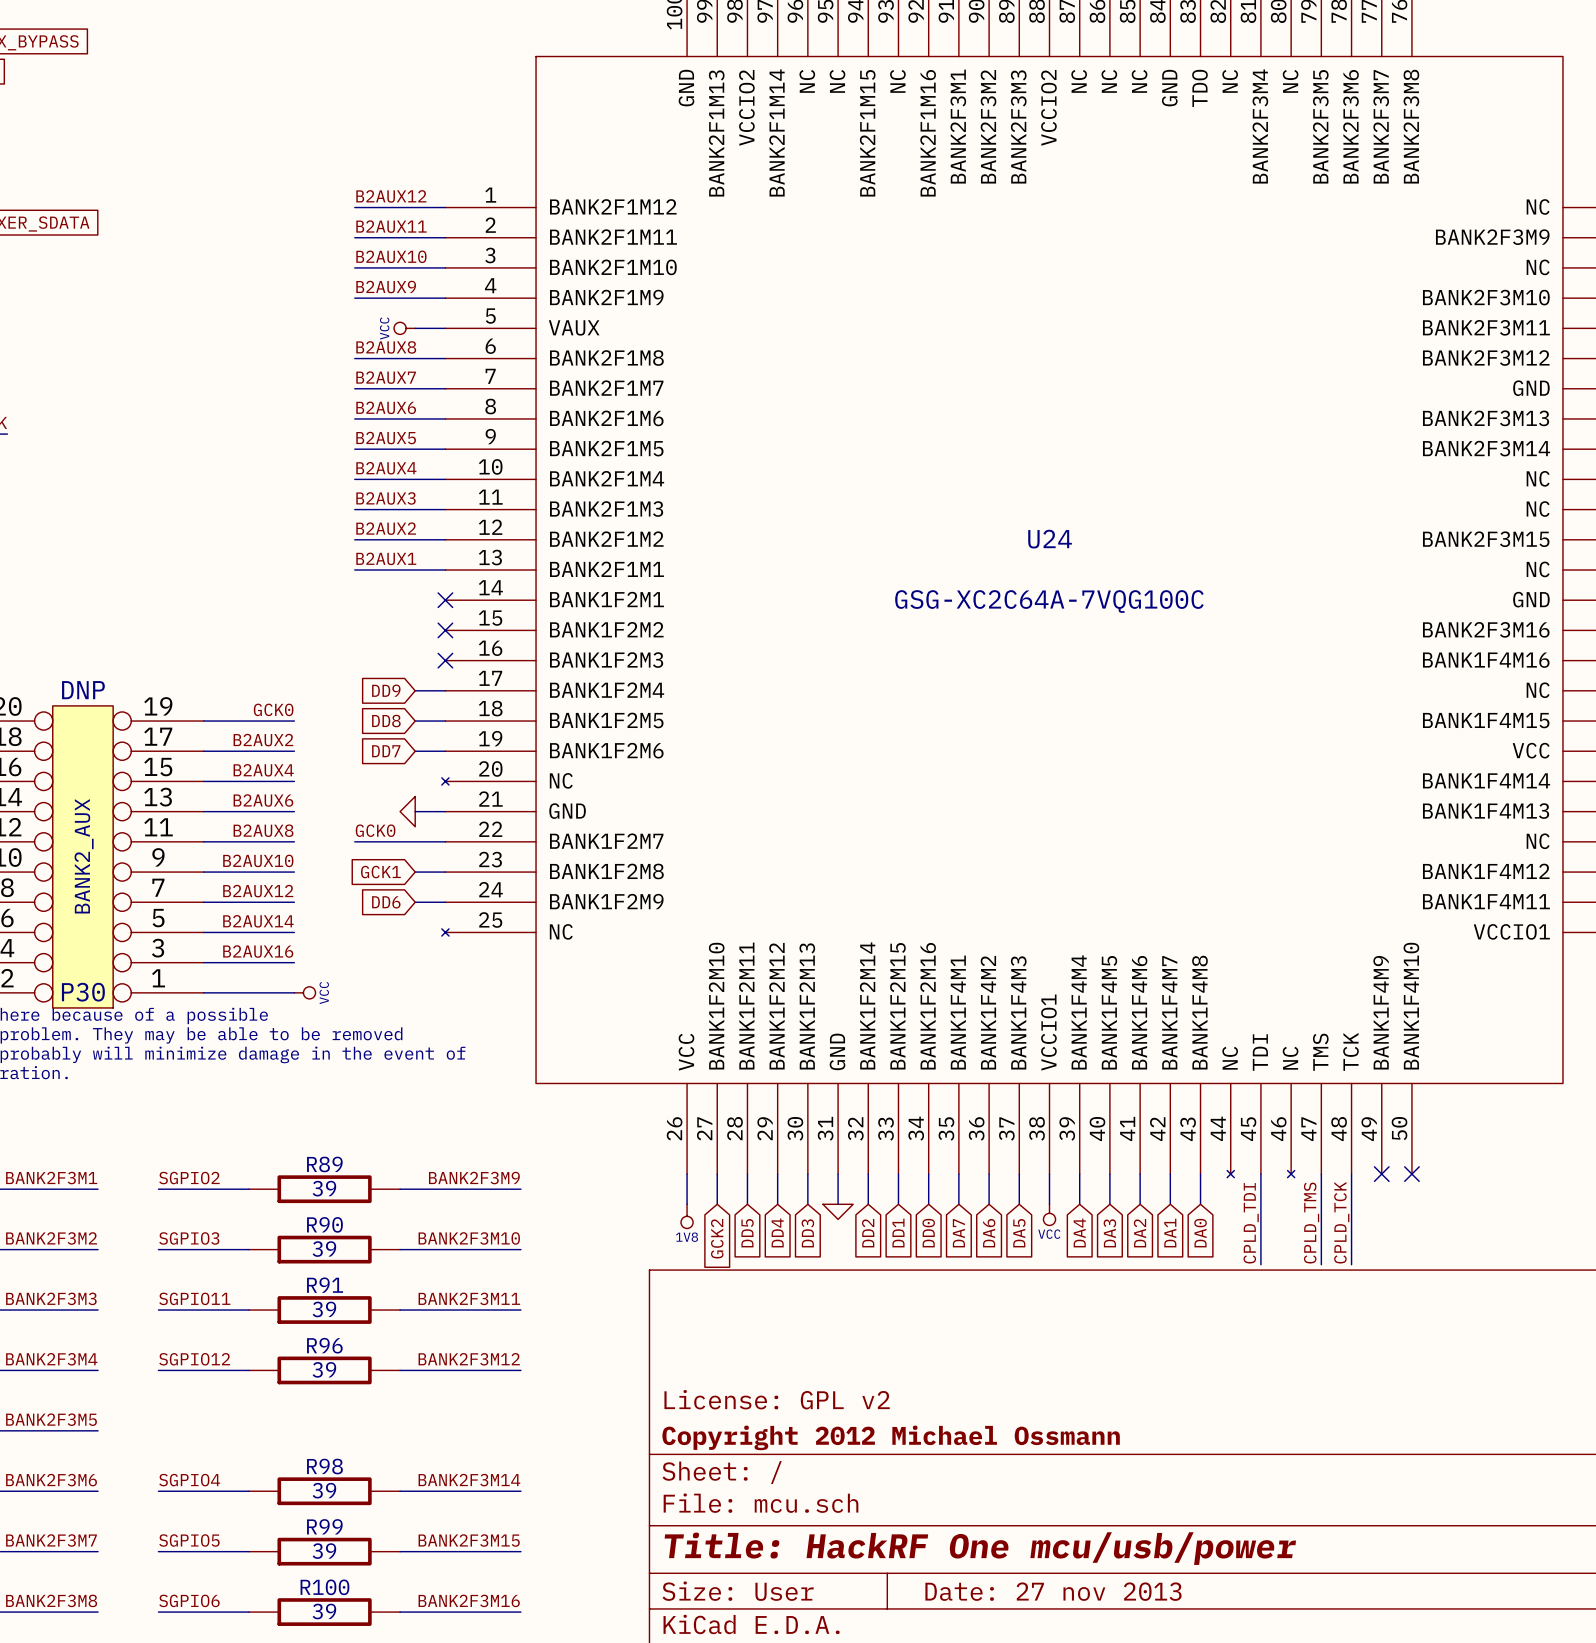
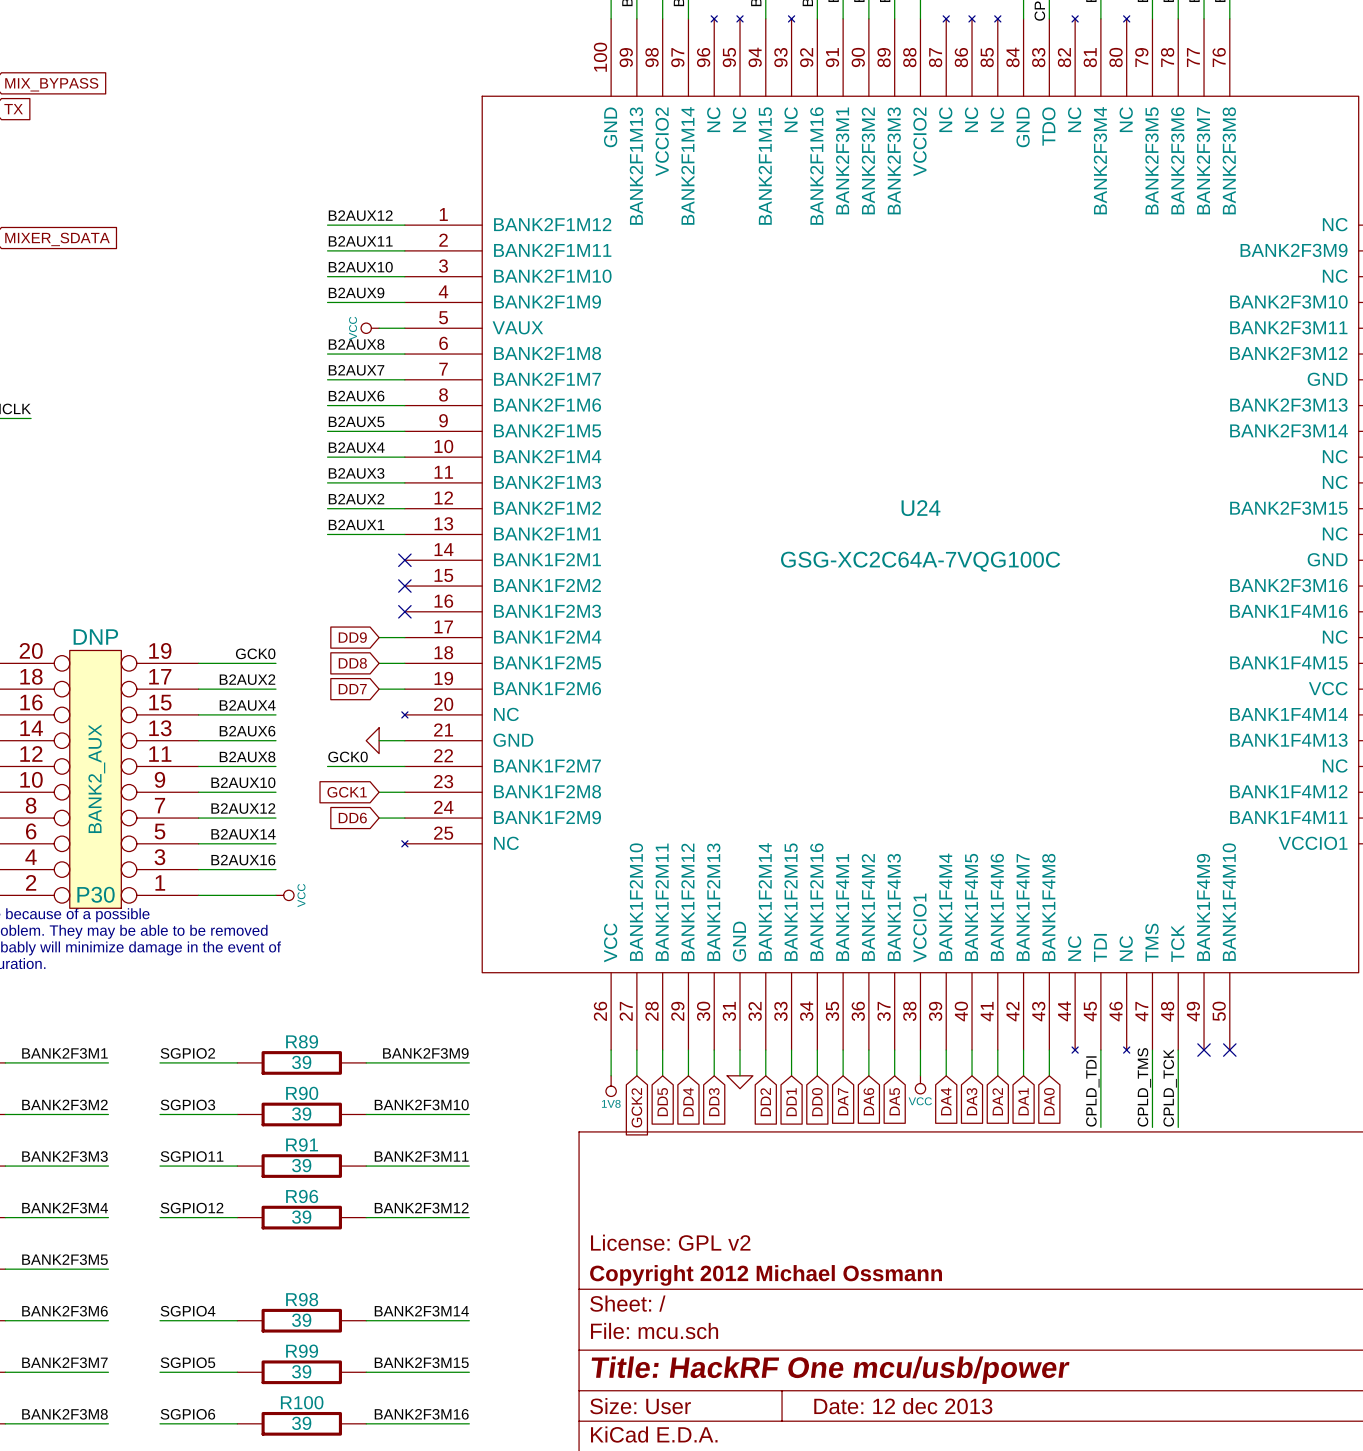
title block: Date: 27 nov 2013 (1053, 1591) -> Date: 12 dec 2013 (903, 1406)

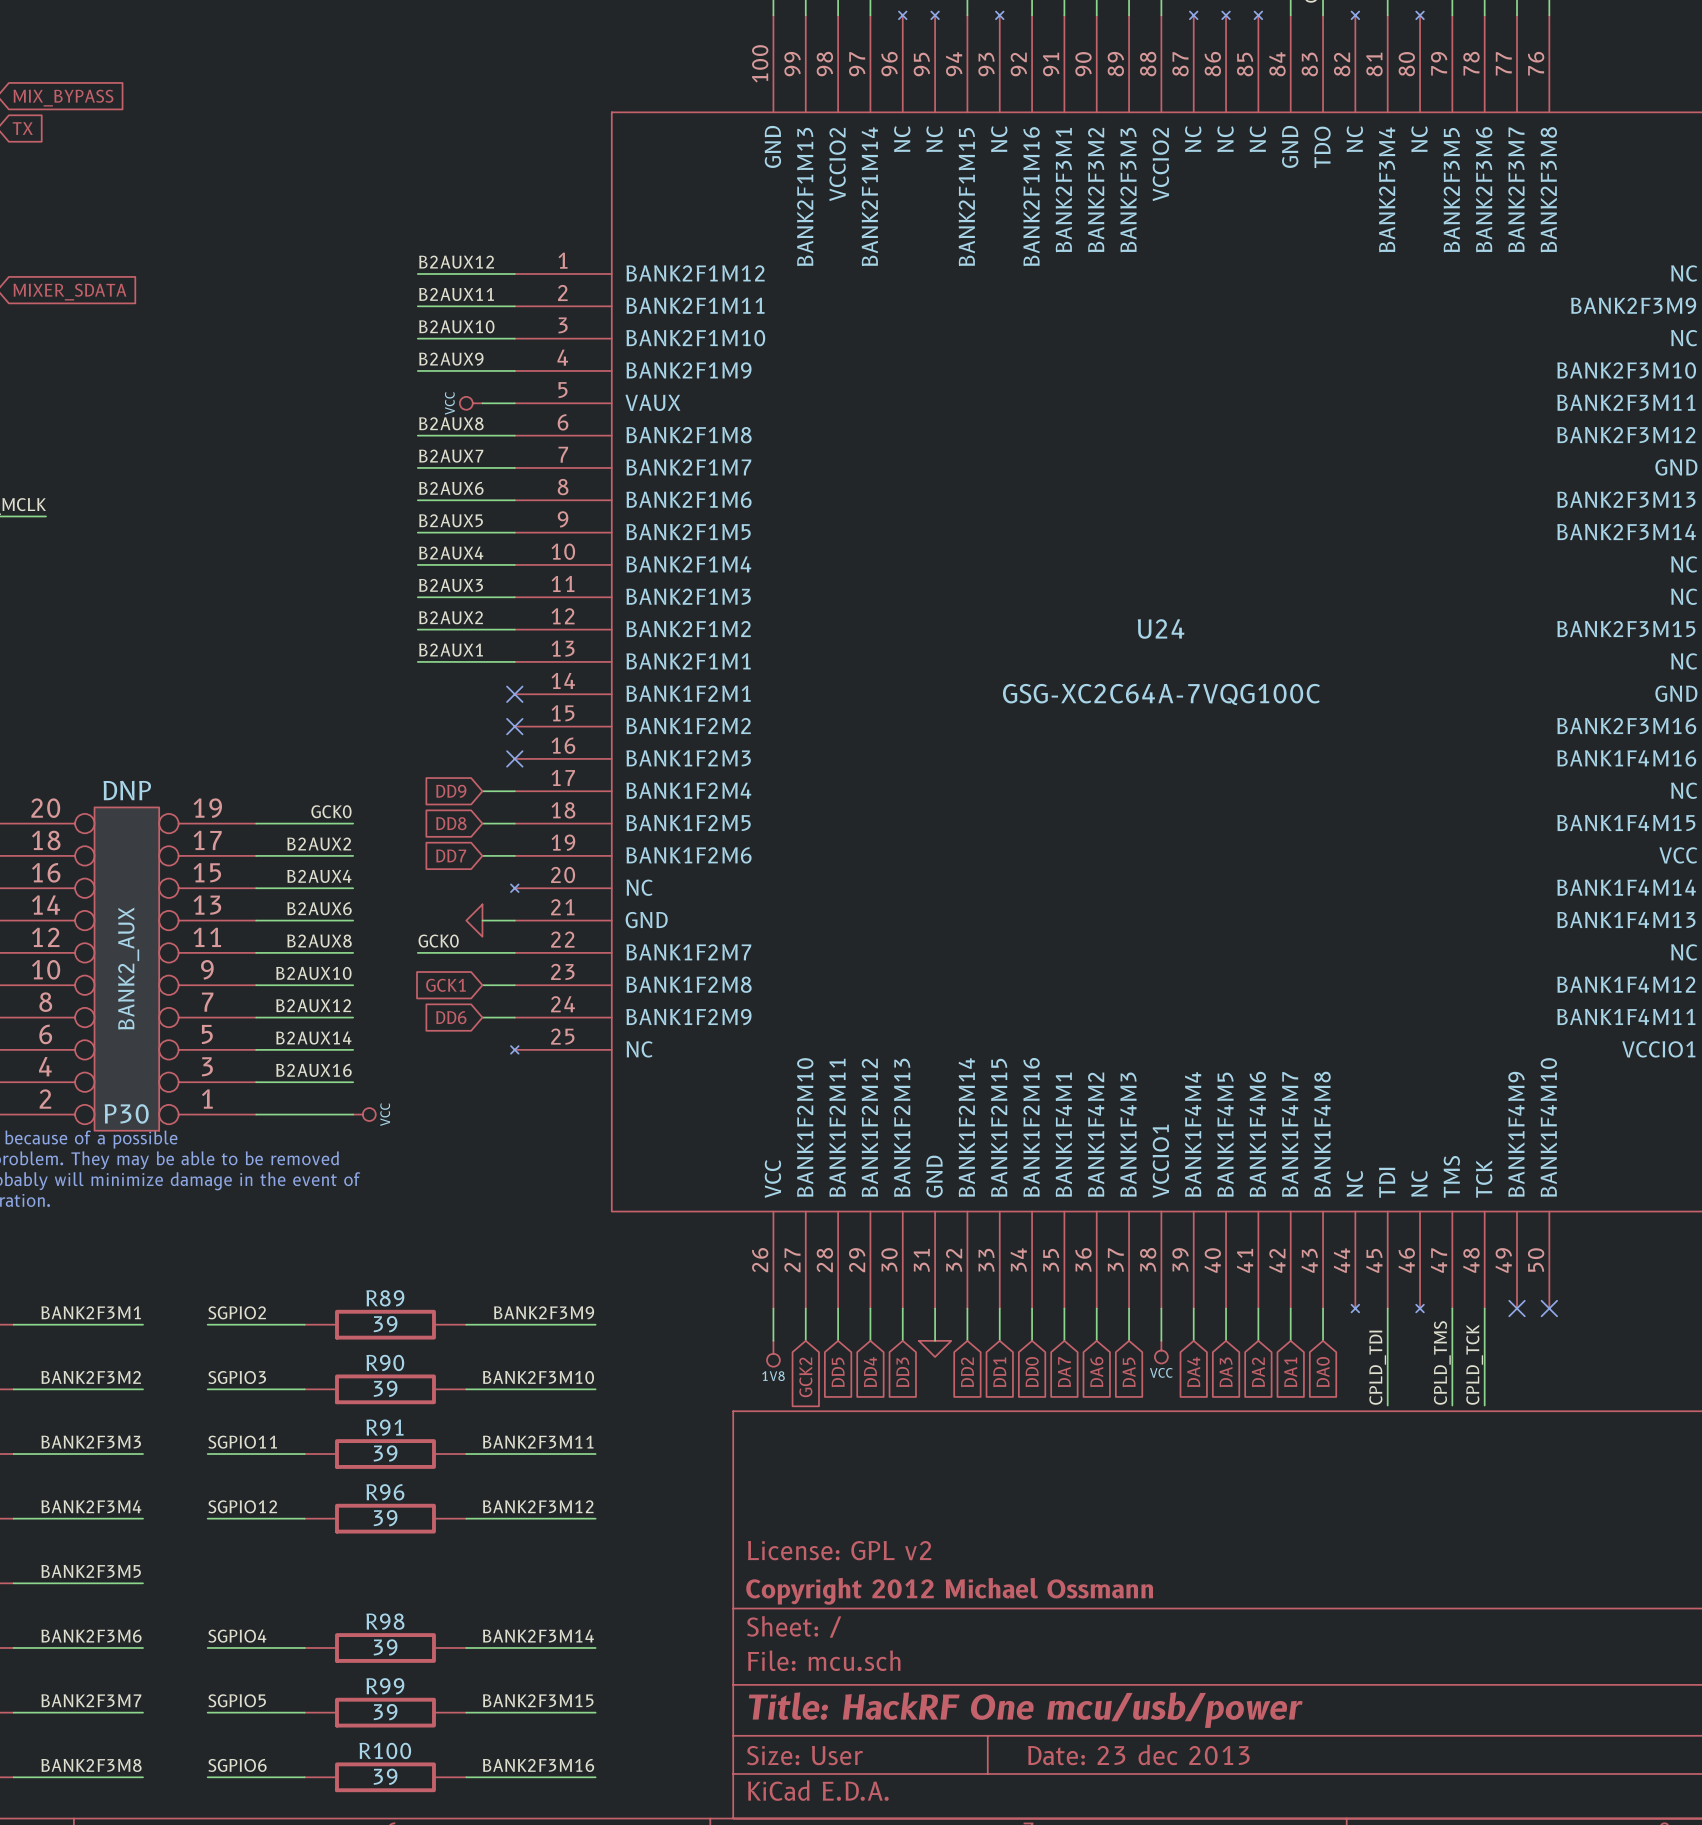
title block: Date: 12 dec 2013 (903, 1406) -> Date: 23 dec 2013 (1138, 1754)

